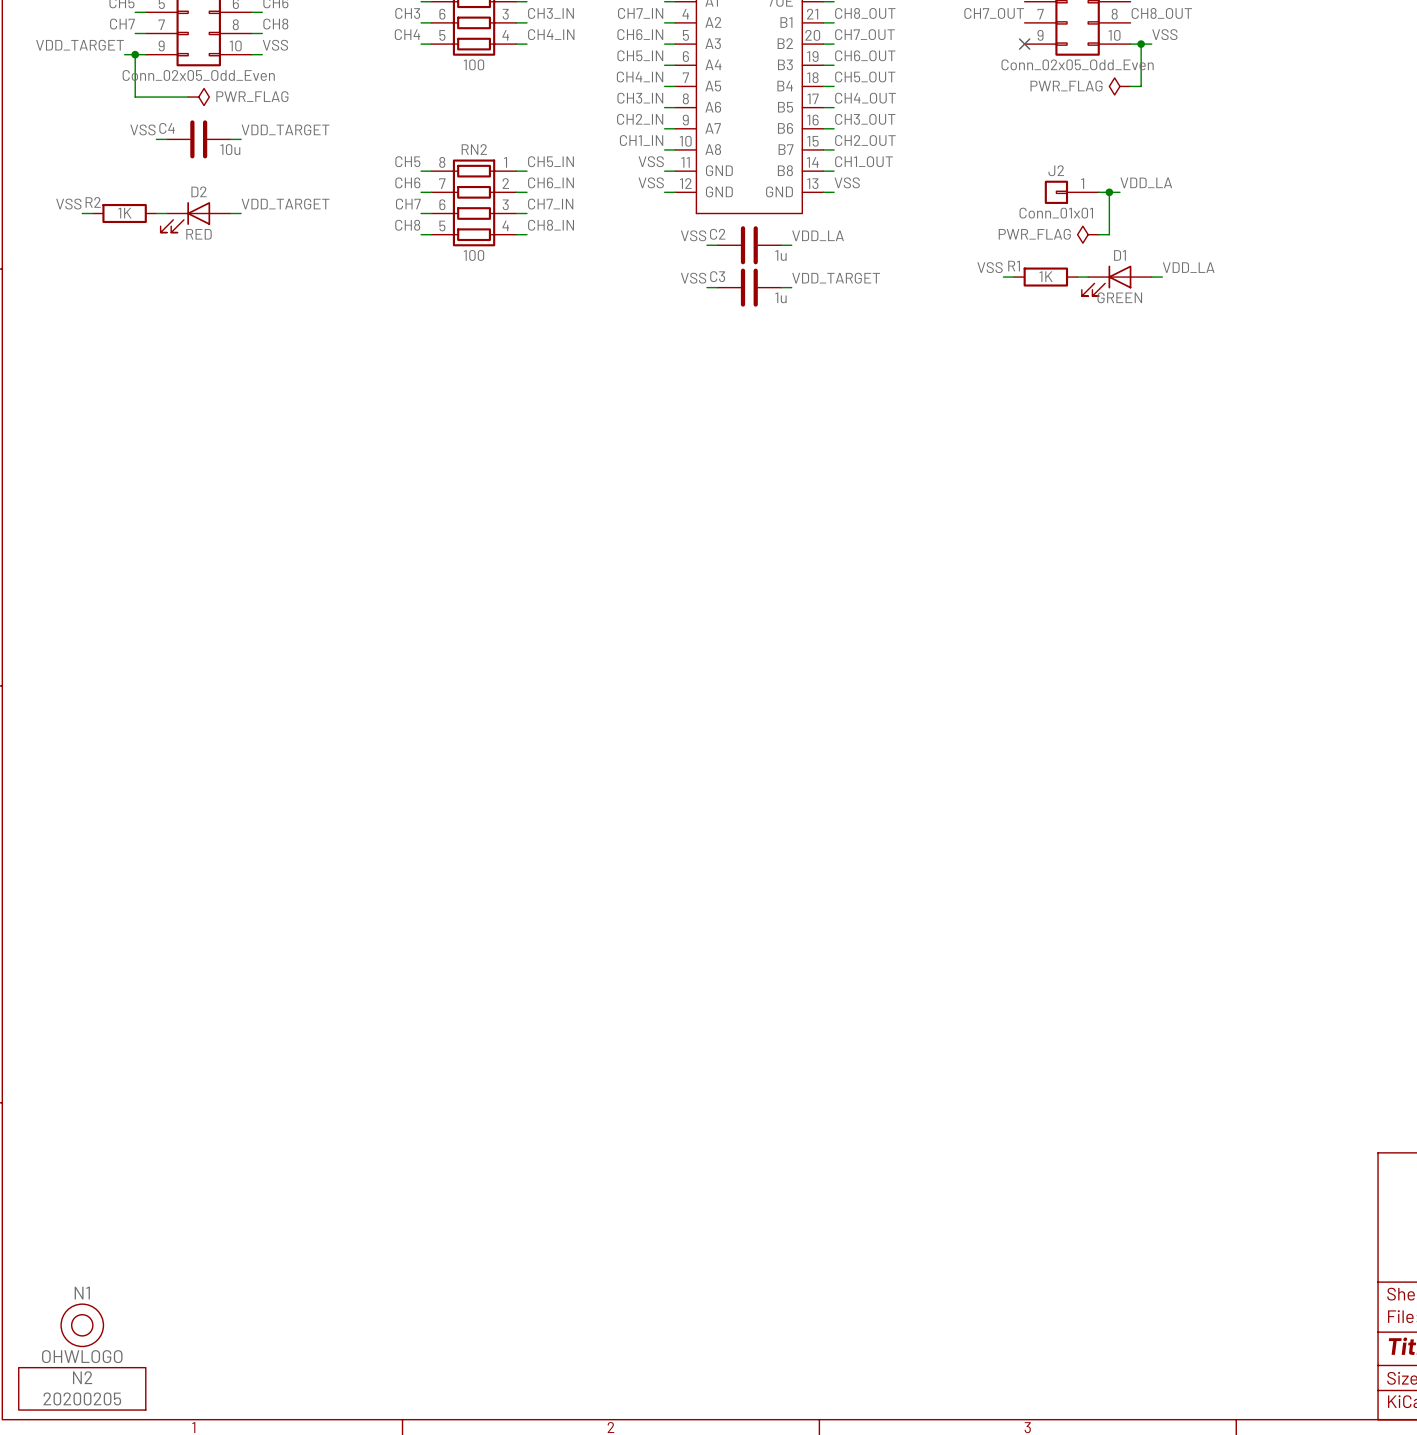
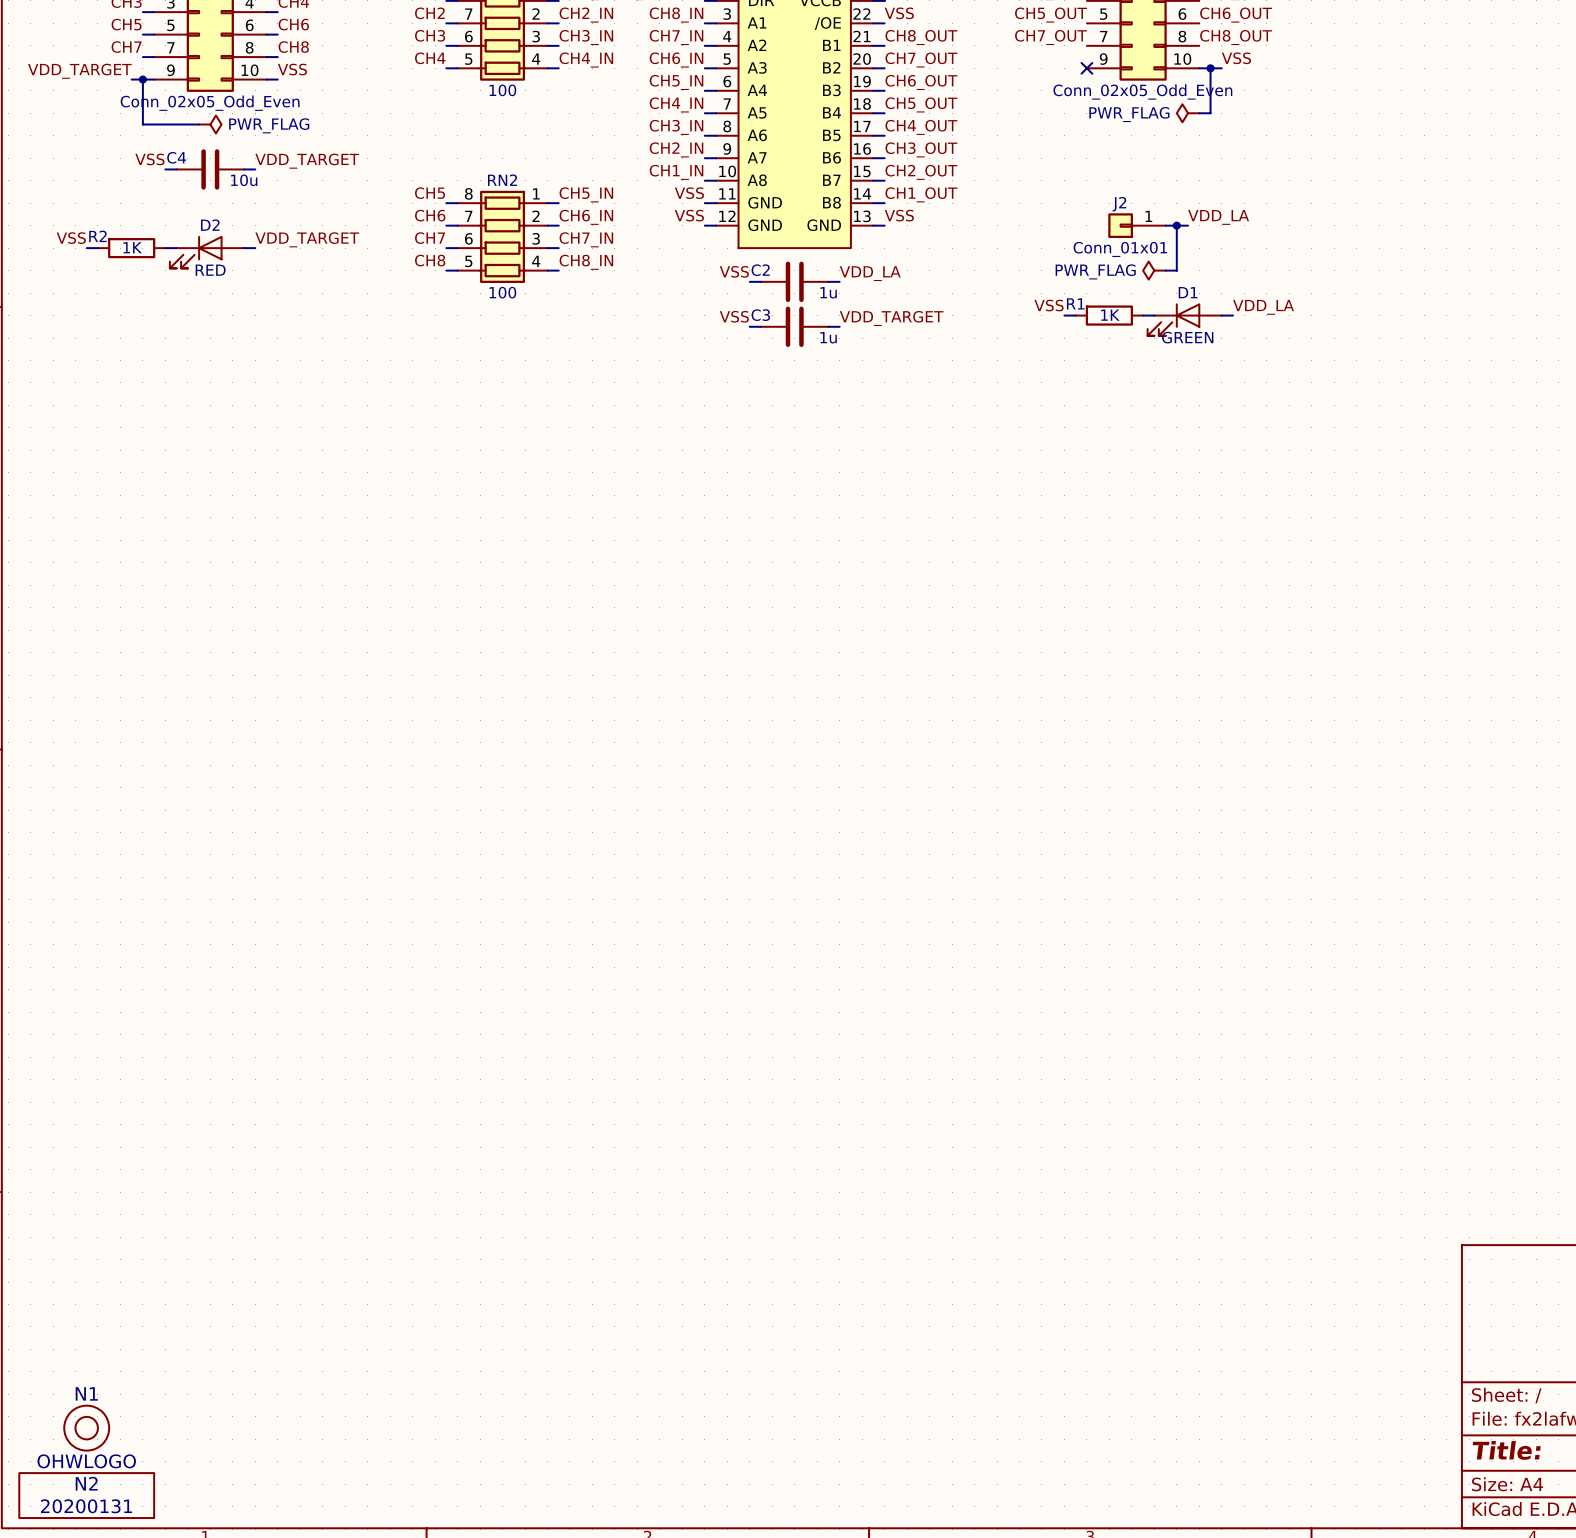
N2 value: 20200205 (82, 1398) -> 20200131 (86, 1506)

